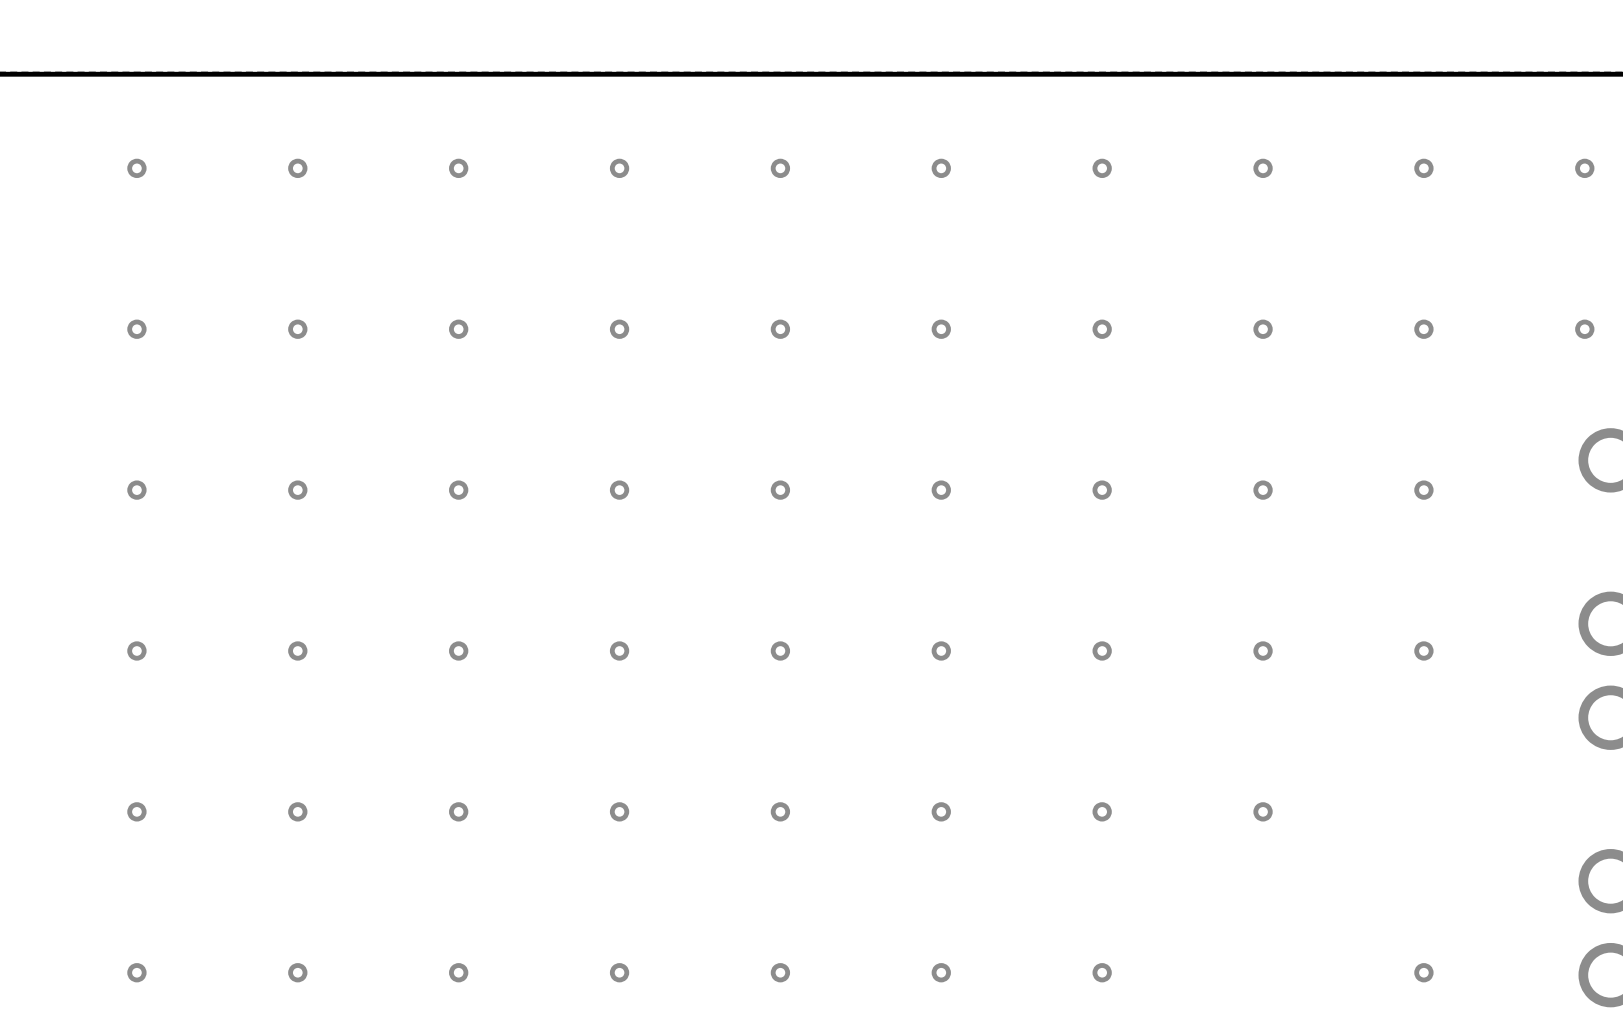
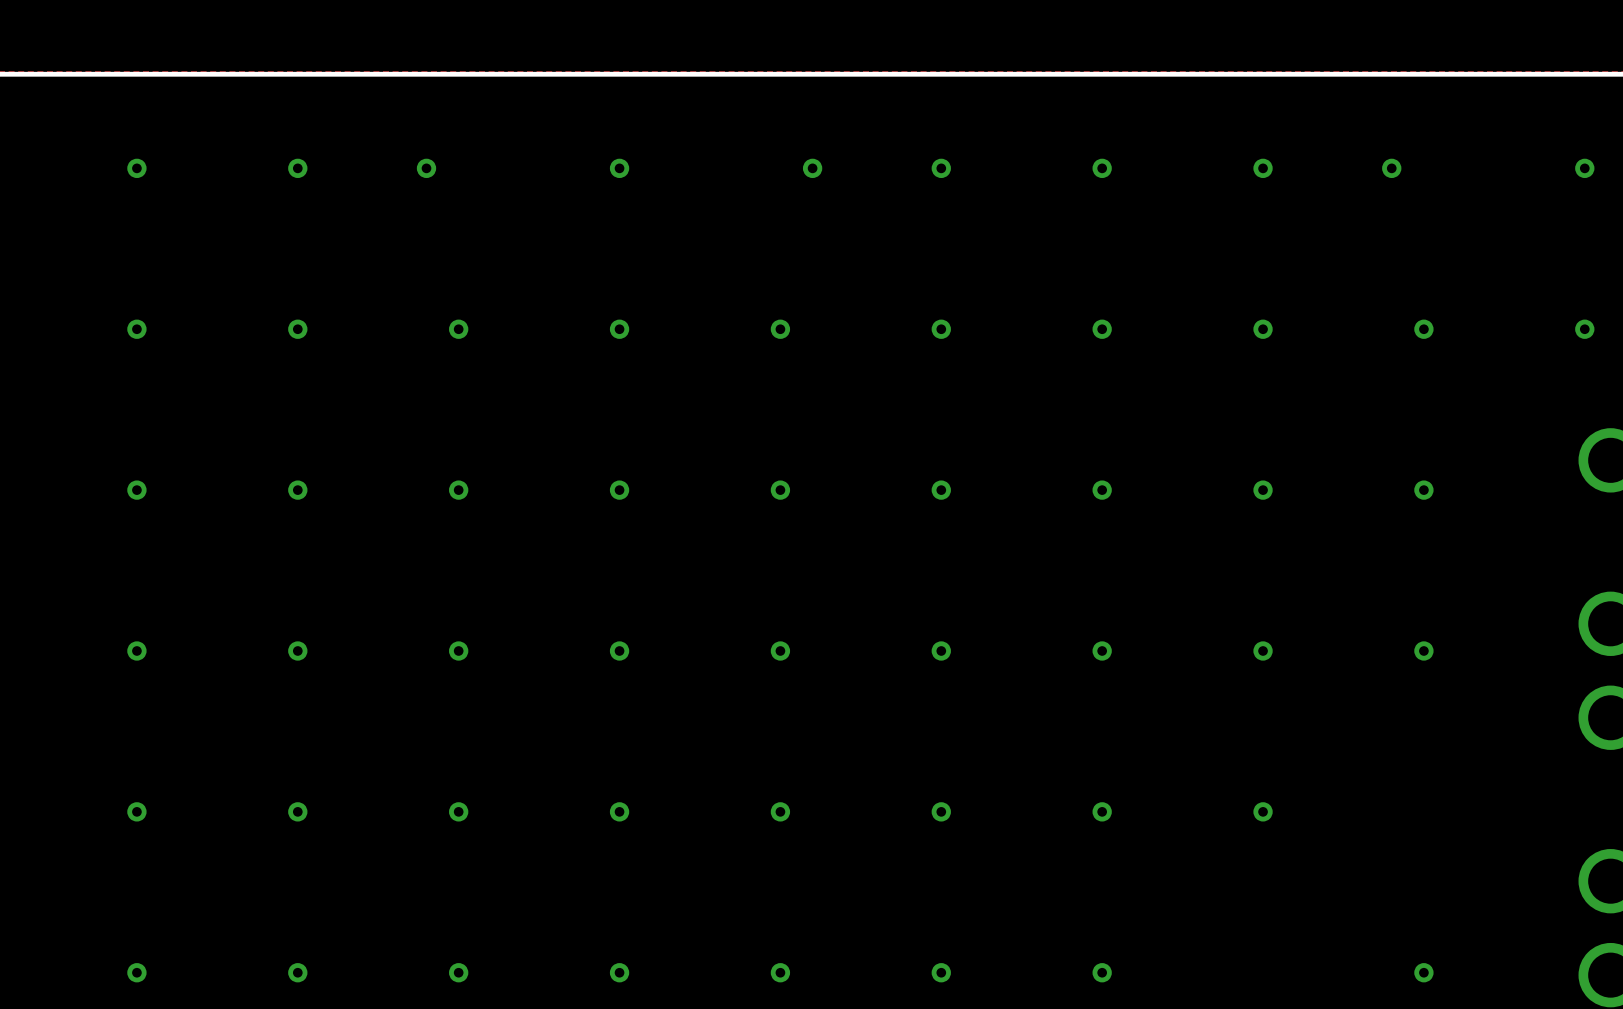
via position: (458, 168) -> (426, 168)
via position: (780, 168) -> (812, 168)
via position: (1423, 168) -> (1391, 168)

